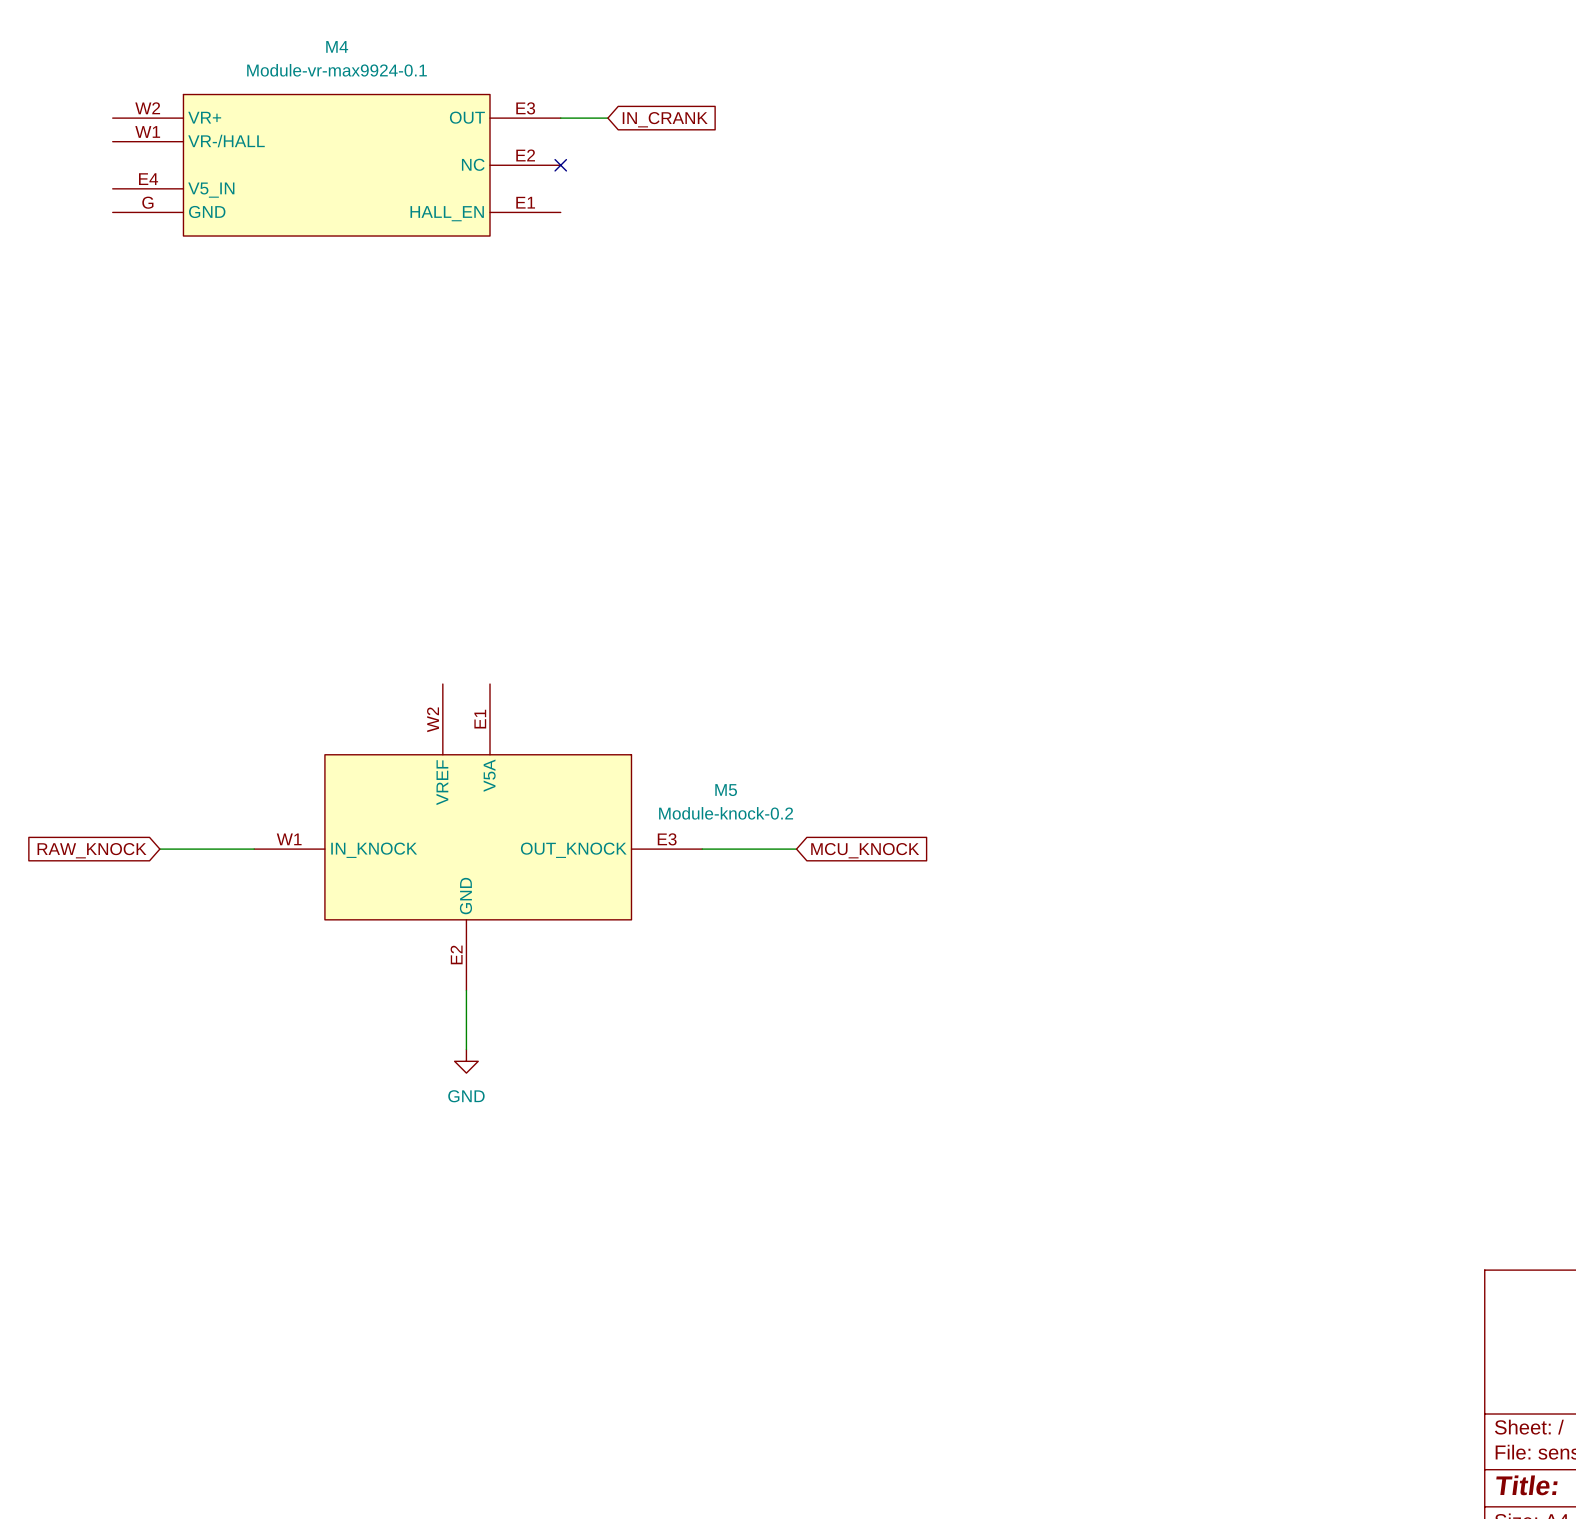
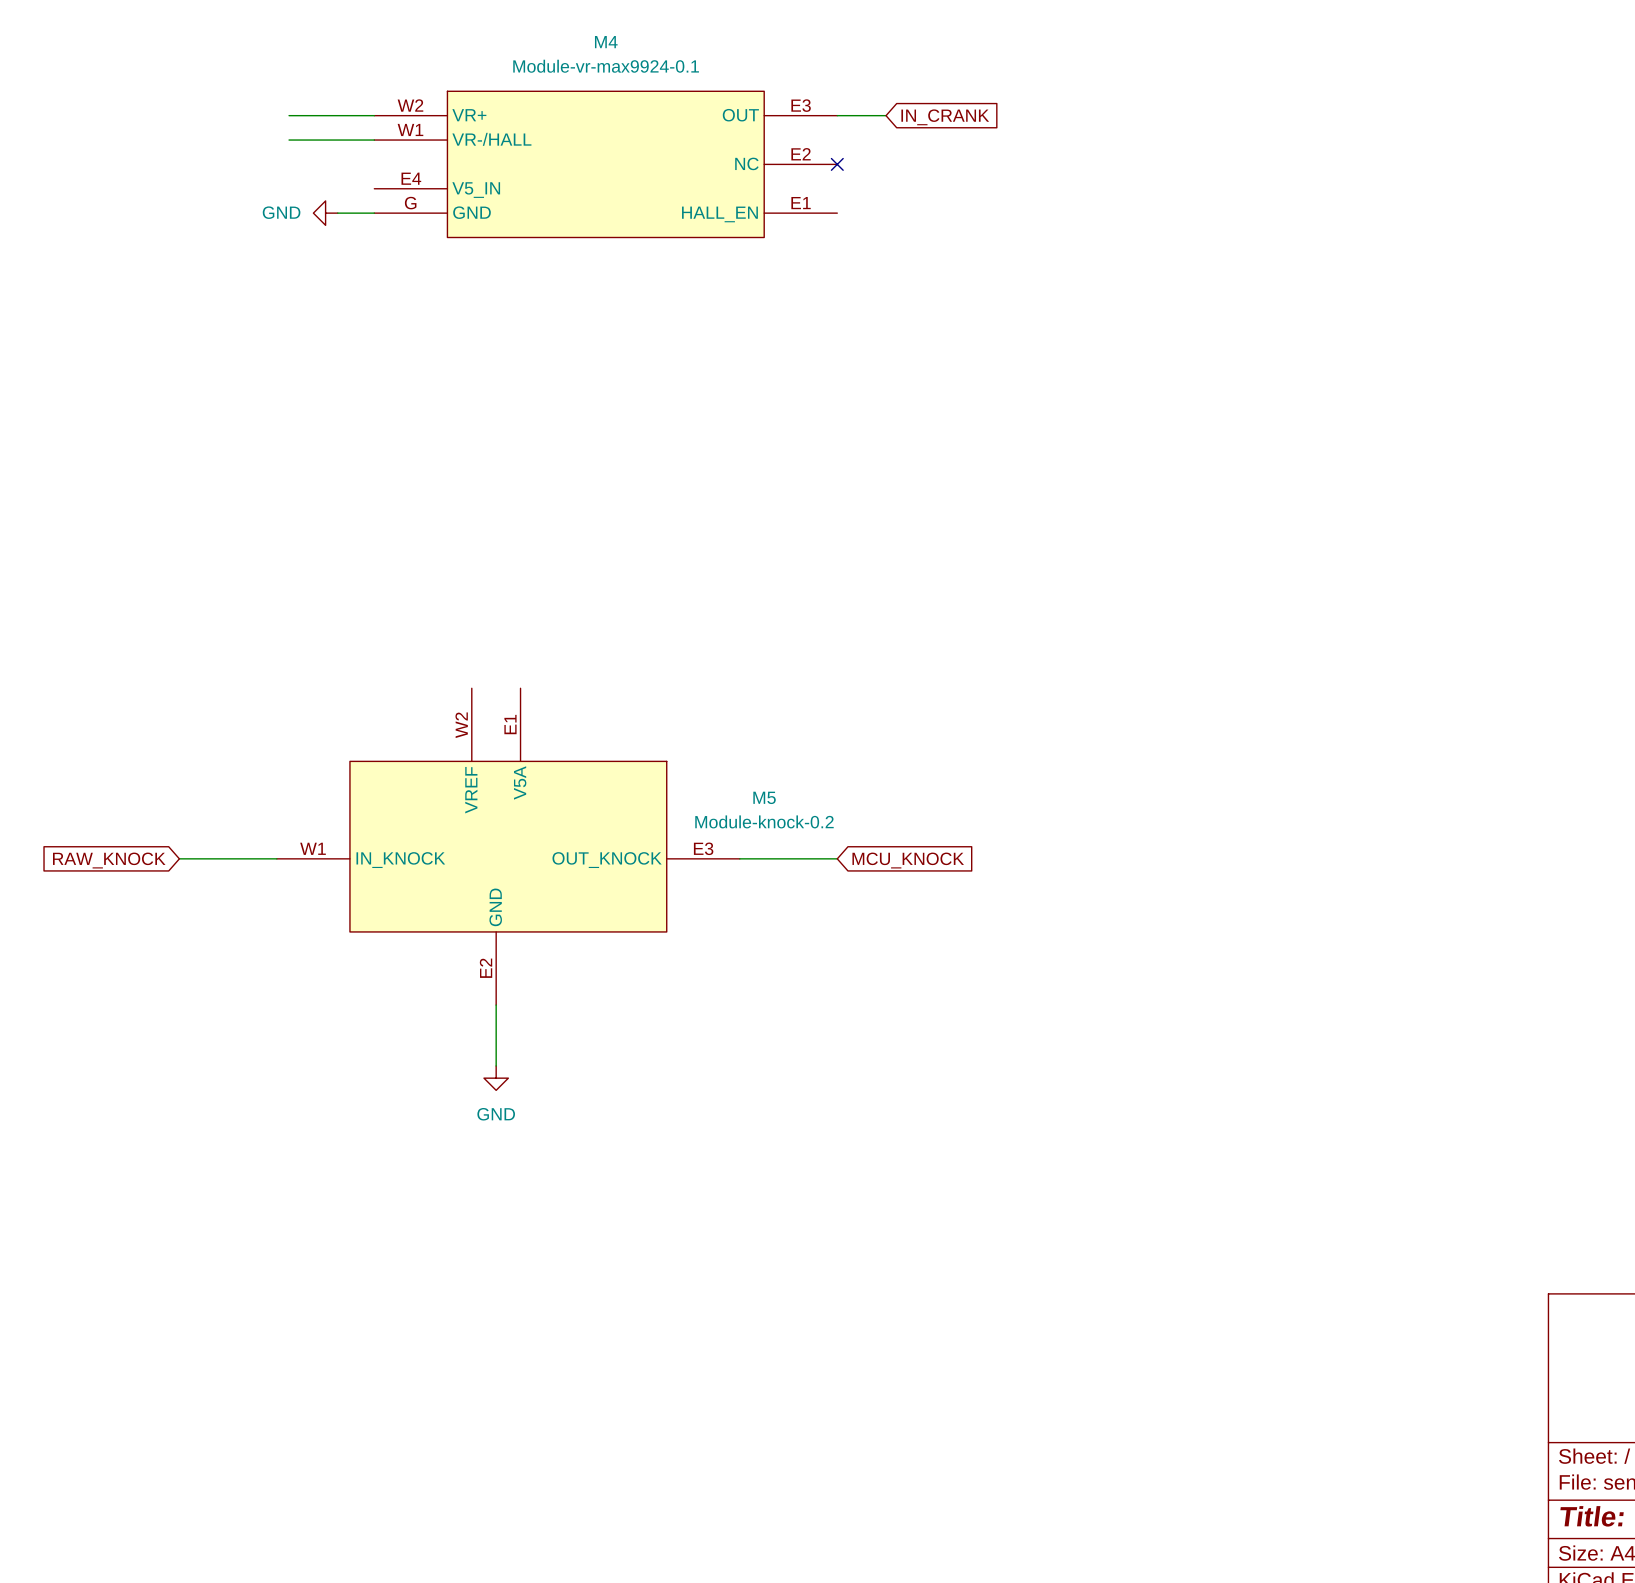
global label: IN_CRANK (665, 119) -> none
wire: none -> (837, 115) (886, 115)
global label: none -> IN_CRANK (945, 117)
M4 position: (336, 165) -> (605, 164)
no-connect mark: (560, 165) -> none
no-connect mark: none -> (837, 164)
power symbol: none -> GND (325, 213)

